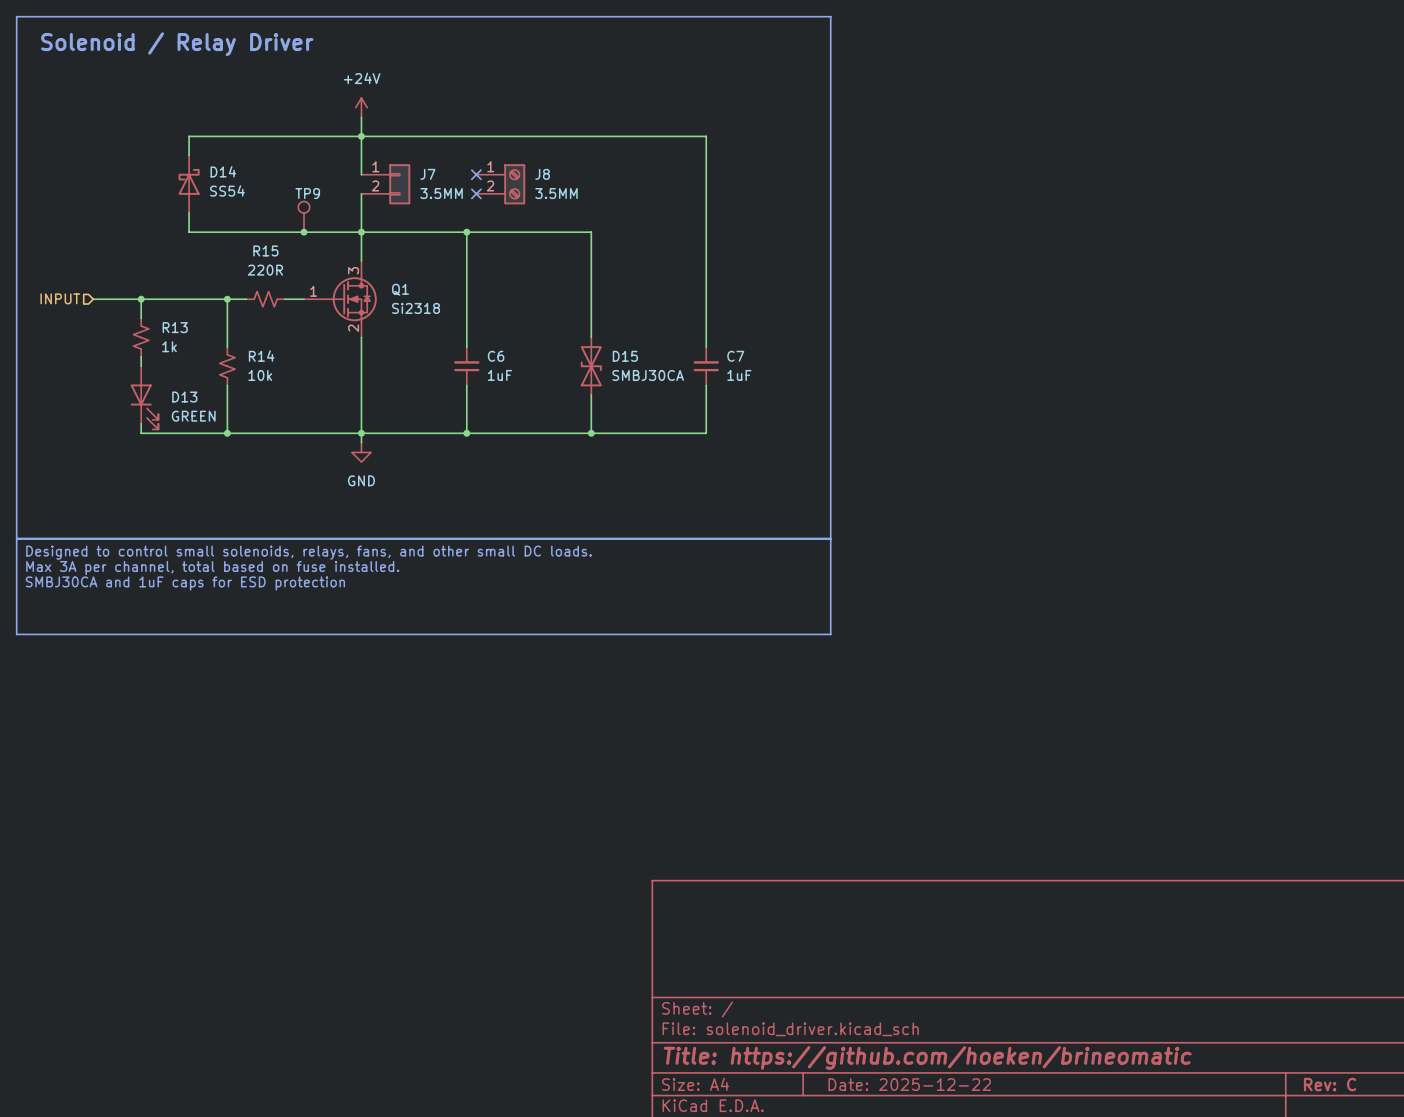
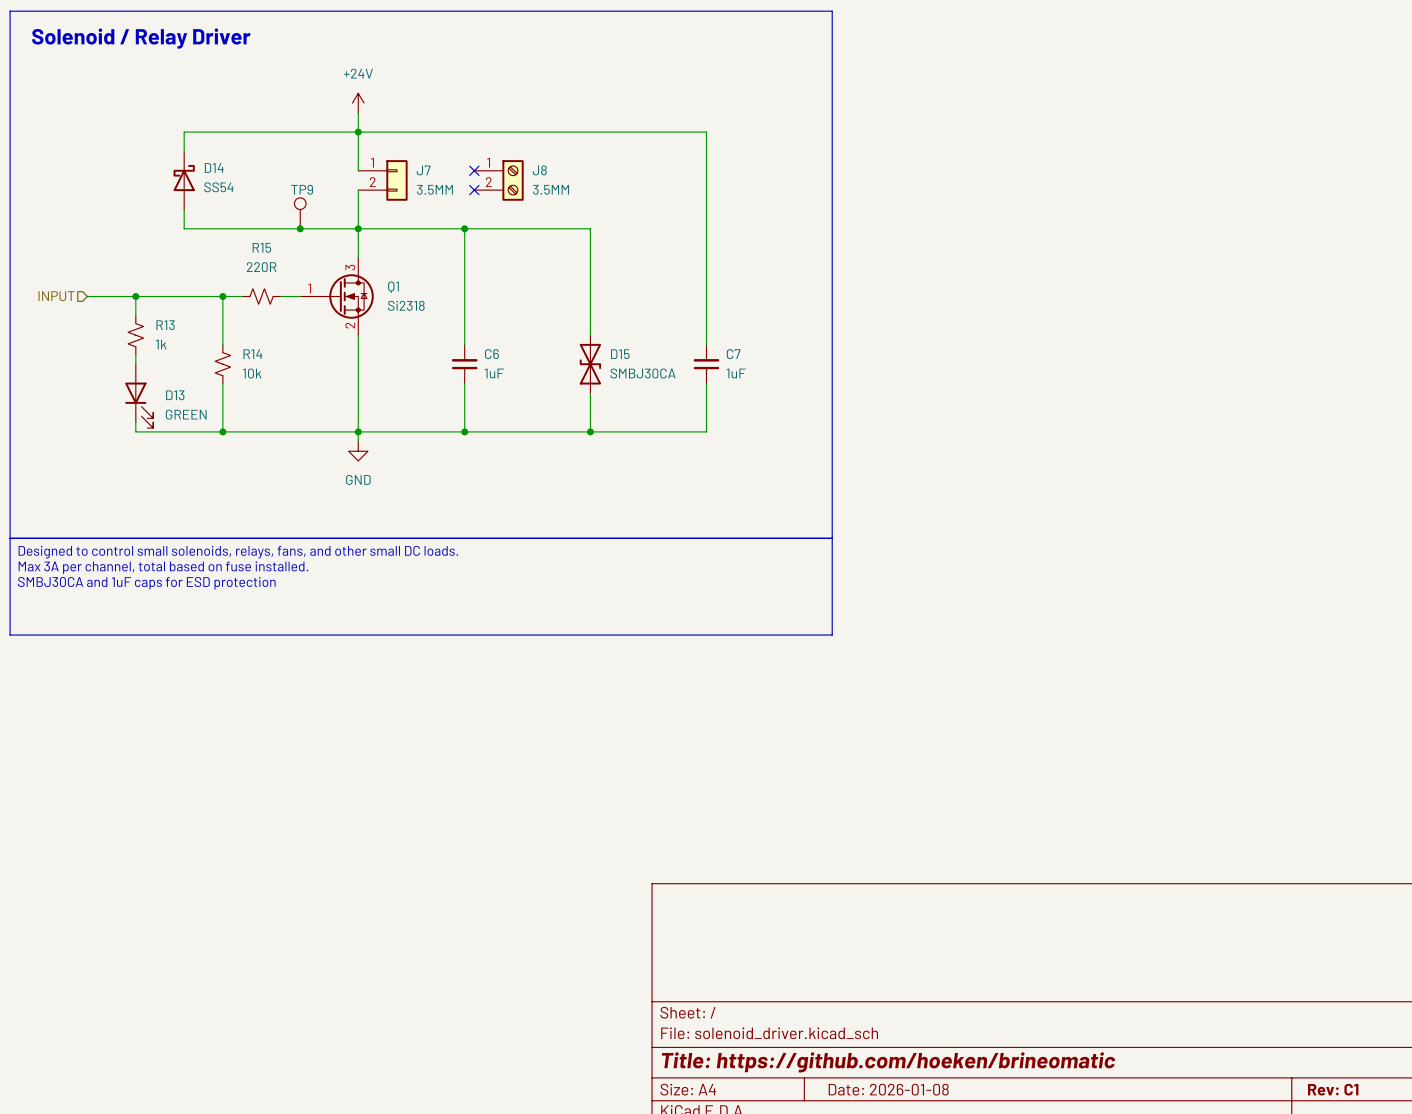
title block: Date: 2025-12-22 (909, 1084) -> Date: 2026-01-08 (888, 1089)
title block: Rev: C (1330, 1084) -> Rev: C1 (1333, 1089)

